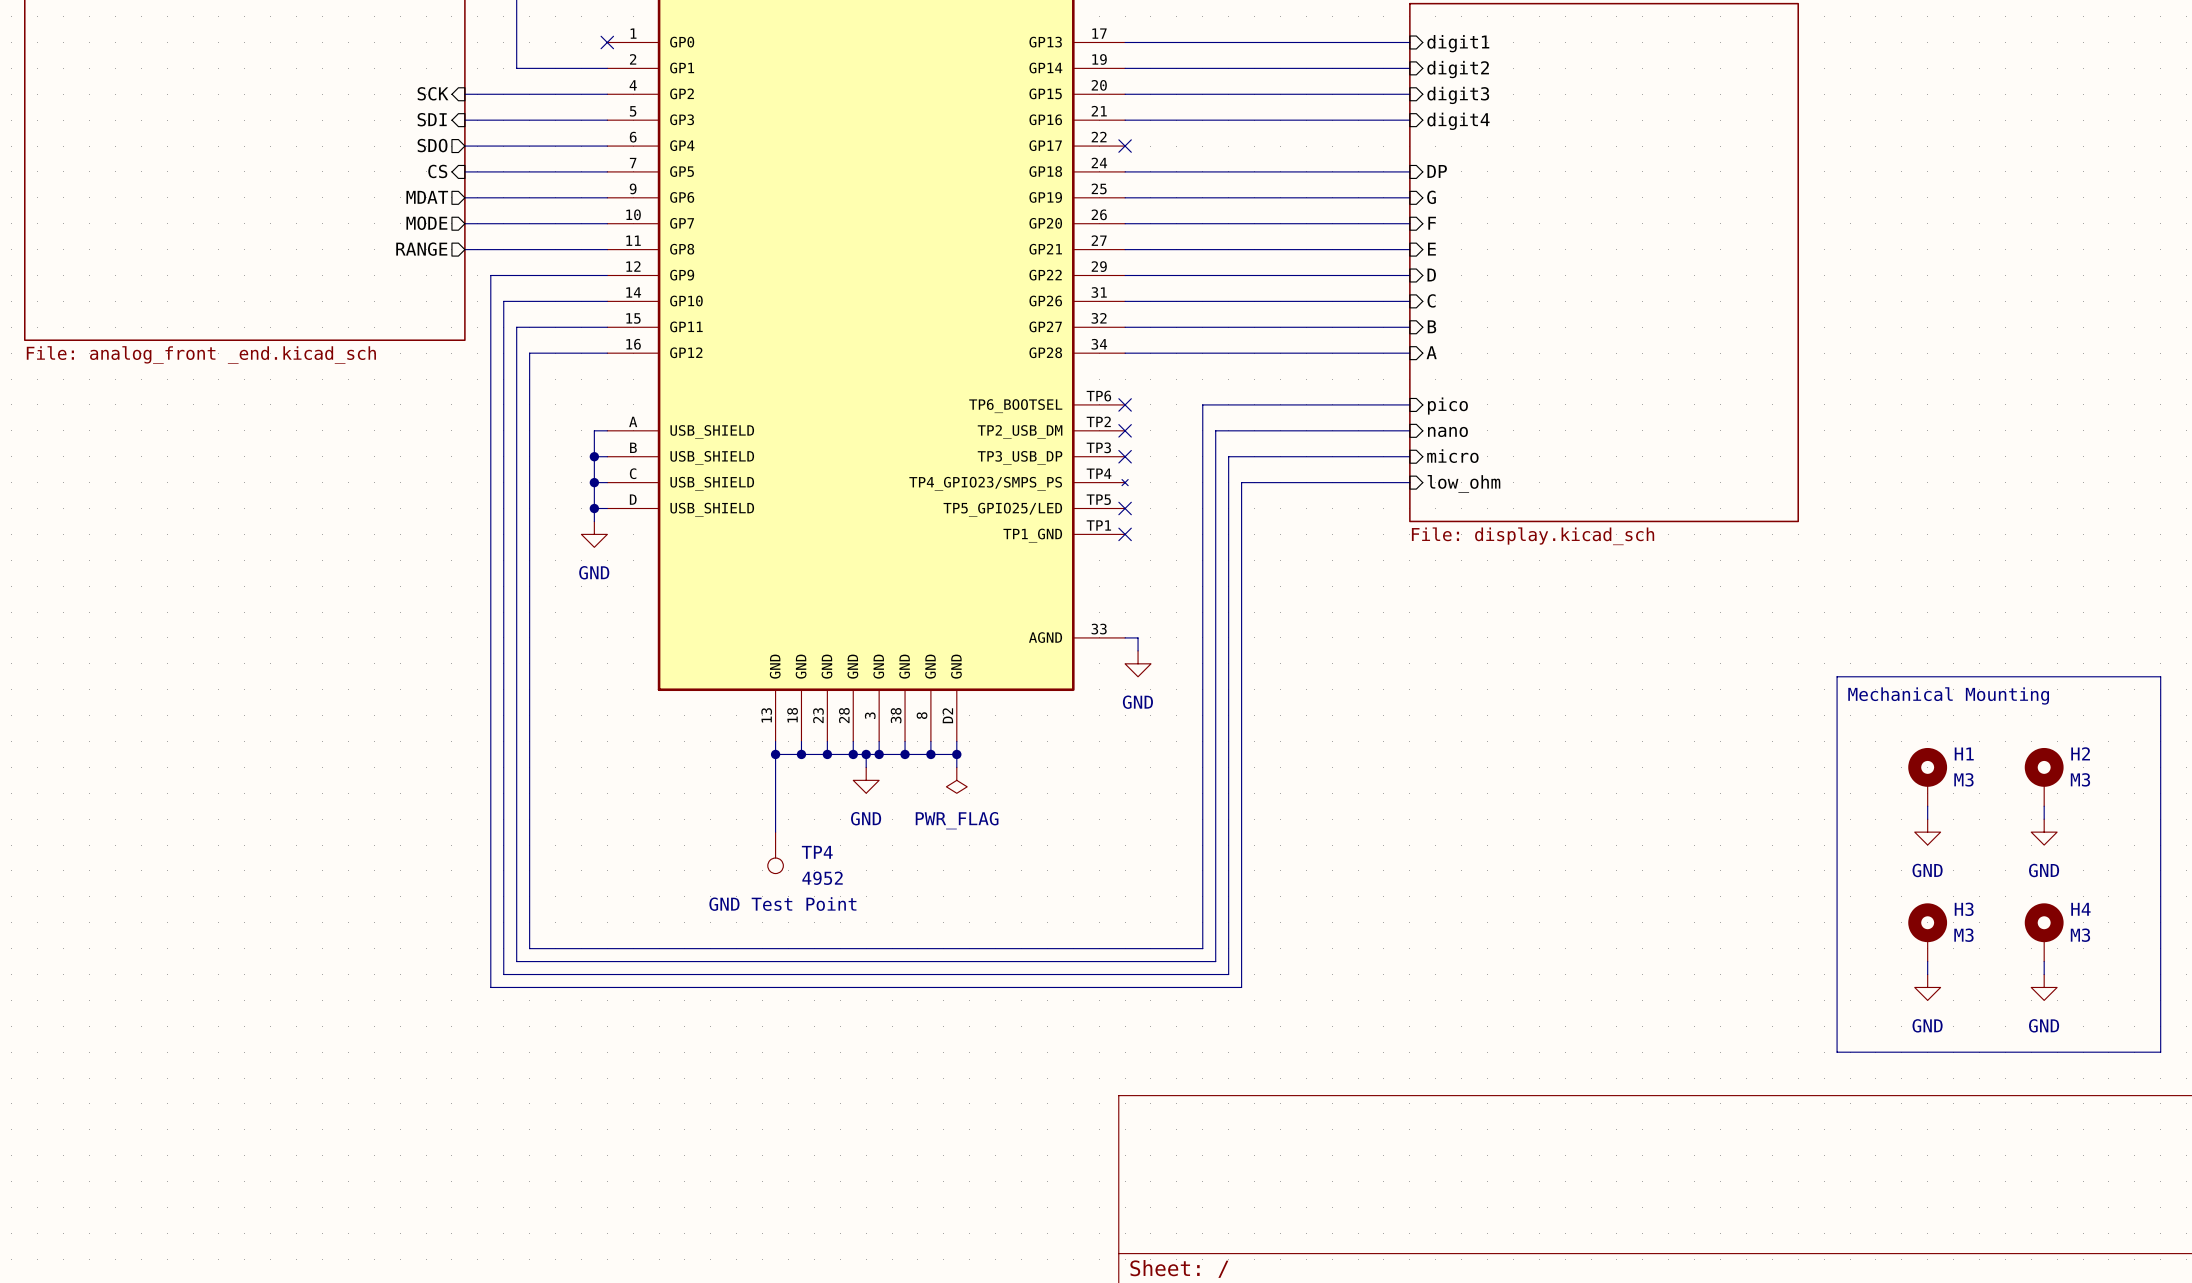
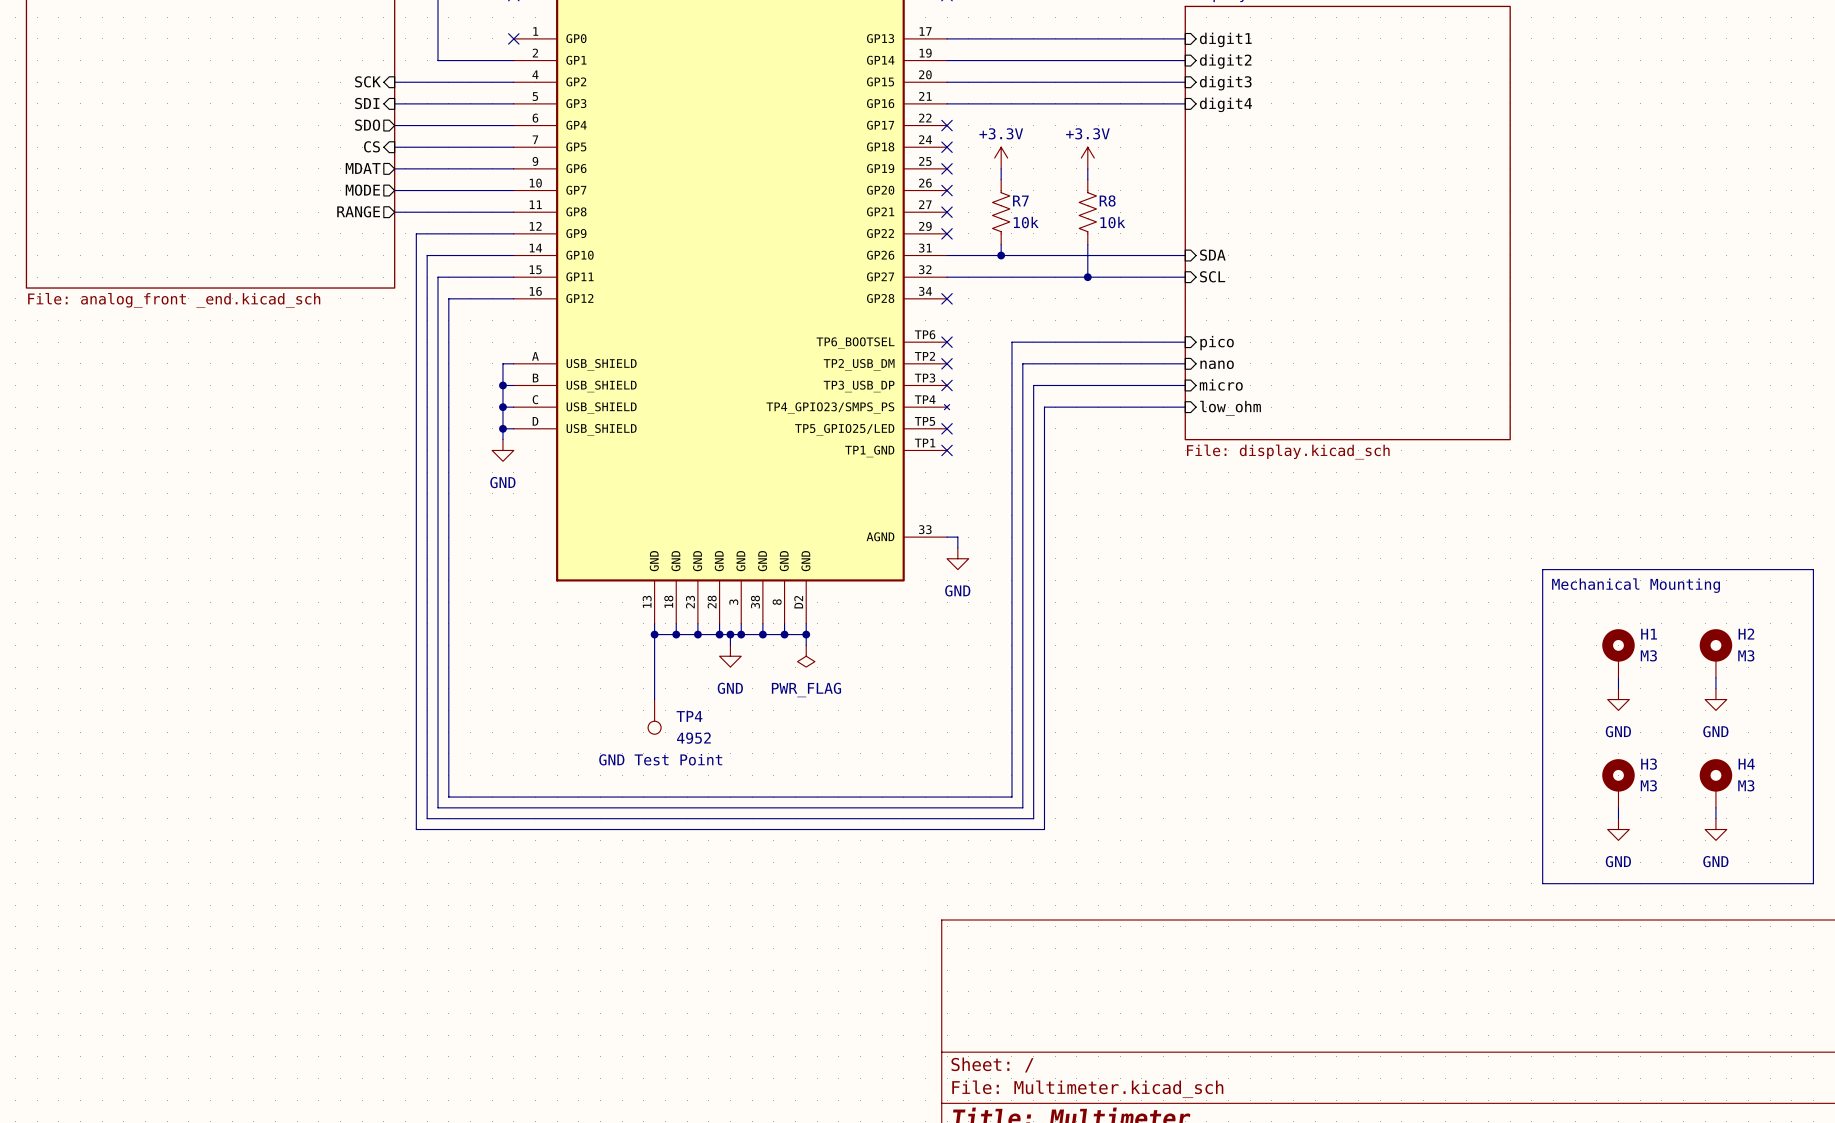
wire: (1125, 171) (1409, 171) -> none
no-connect mark: none -> (947, 147)
sheet pin: DP (1437, 171) -> none
power symbol: none -> +3.3V (1001, 158)
power symbol: none -> +3.3V (1087, 158)
wire: (1125, 197) (1409, 197) -> none
no-connect mark: none -> (947, 168)
wire: none -> (1001, 168) (1001, 179)
wire: none -> (1087, 168) (1087, 179)
sheet pin: G (1431, 197) -> none
wire: (1125, 223) (1409, 223) -> none
no-connect mark: none -> (947, 190)
sheet pin: F (1432, 223) -> none
wire: (1125, 249) (1409, 249) -> none
no-connect mark: none -> (947, 212)
R7: none -> 10k (1001, 212)
R8: none -> 10k (1087, 212)
sheet pin: E (1431, 249) -> none
wire: (1125, 275) (1409, 275) -> none
no-connect mark: none -> (947, 233)
sheet pin: D (1431, 275) -> none
wire: none -> (1001, 244) (1001, 255)
wire: none -> (1087, 244) (1087, 277)
sheet pin: C (1431, 300) -> SDA (1212, 255)
junction: none -> (1001, 255)
sheet pin: B (1431, 326) -> SCL (1212, 276)
junction: none -> (1087, 277)
sheet pin: A (1431, 352) -> none
wire: (1125, 353) (1409, 353) -> none
no-connect mark: none -> (947, 298)

